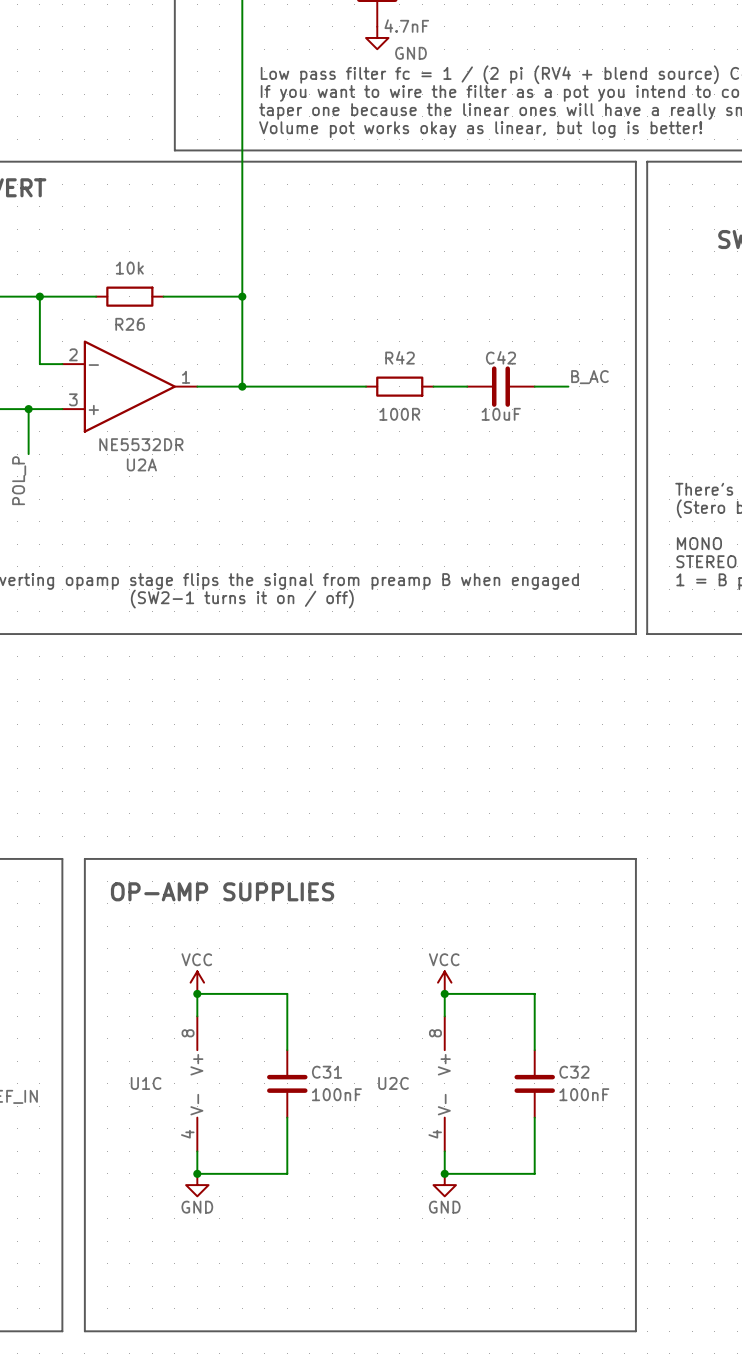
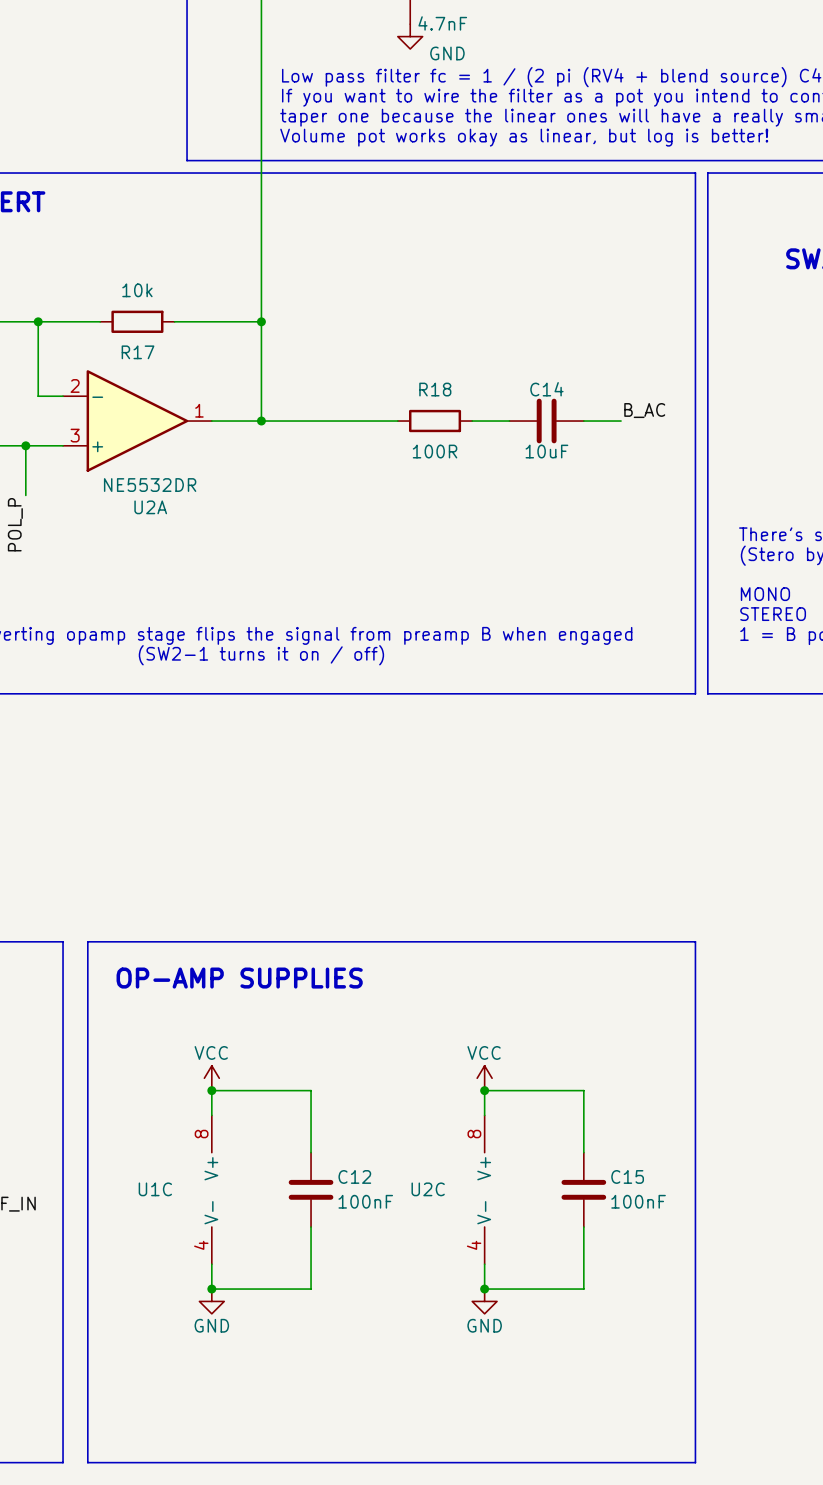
R26 name: R26 (130, 324) -> R17 (138, 352)
R42 name: R42 (400, 357) -> R18 (435, 389)
C42 name: C42 (500, 357) -> C14 (546, 389)
C31 name: C31 (327, 1072) -> C12 (354, 1176)
C32 name: C32 (574, 1072) -> C15 (627, 1176)

